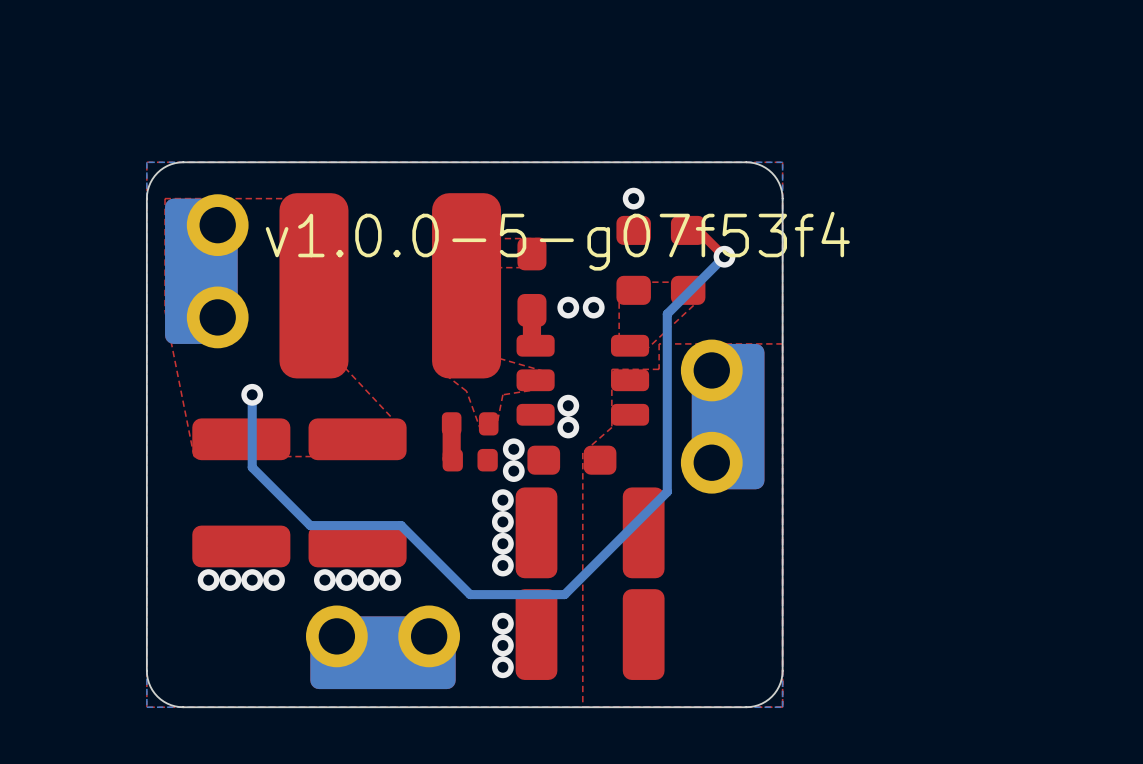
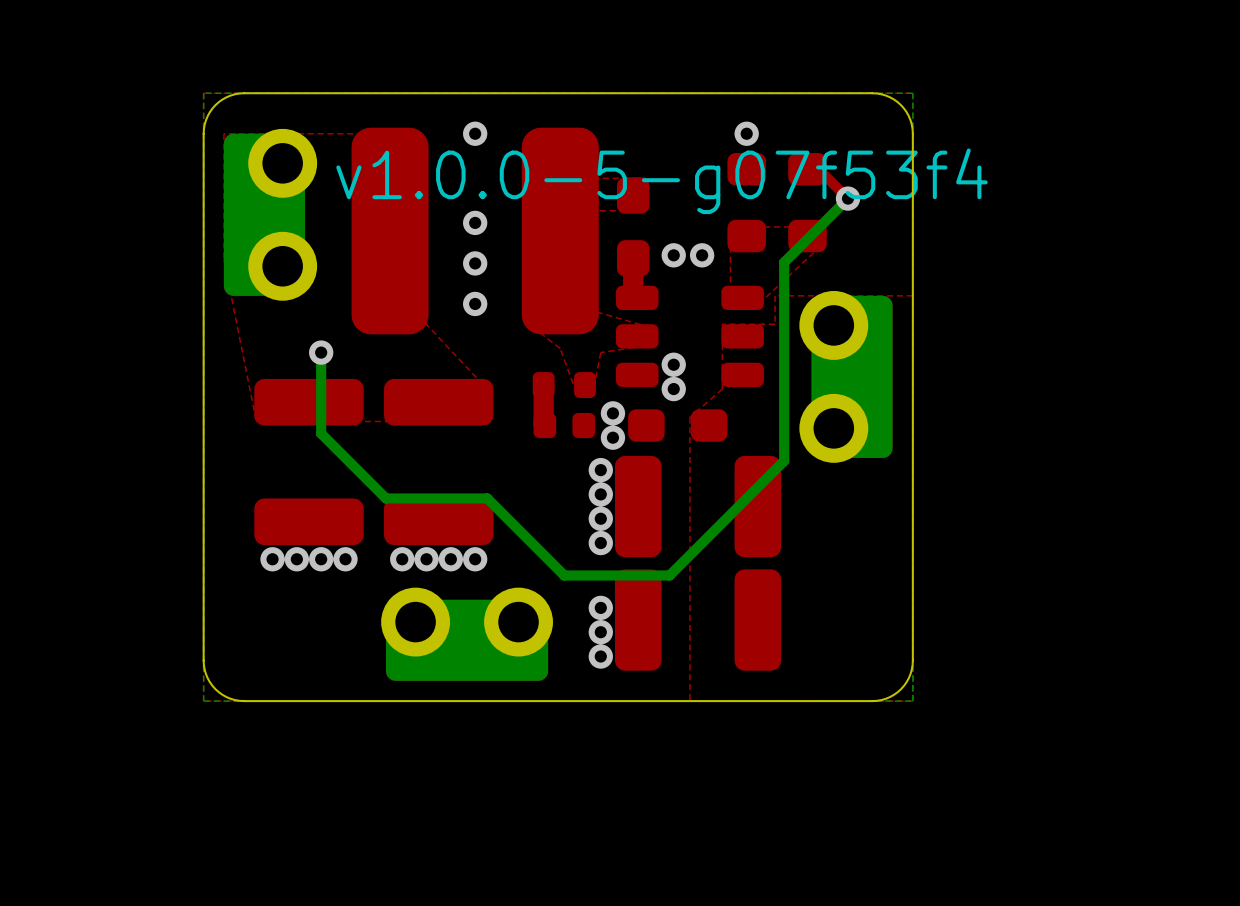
via: none -> (475, 133)
via: none -> (475, 222)
via: none -> (475, 263)
via: none -> (475, 303)

